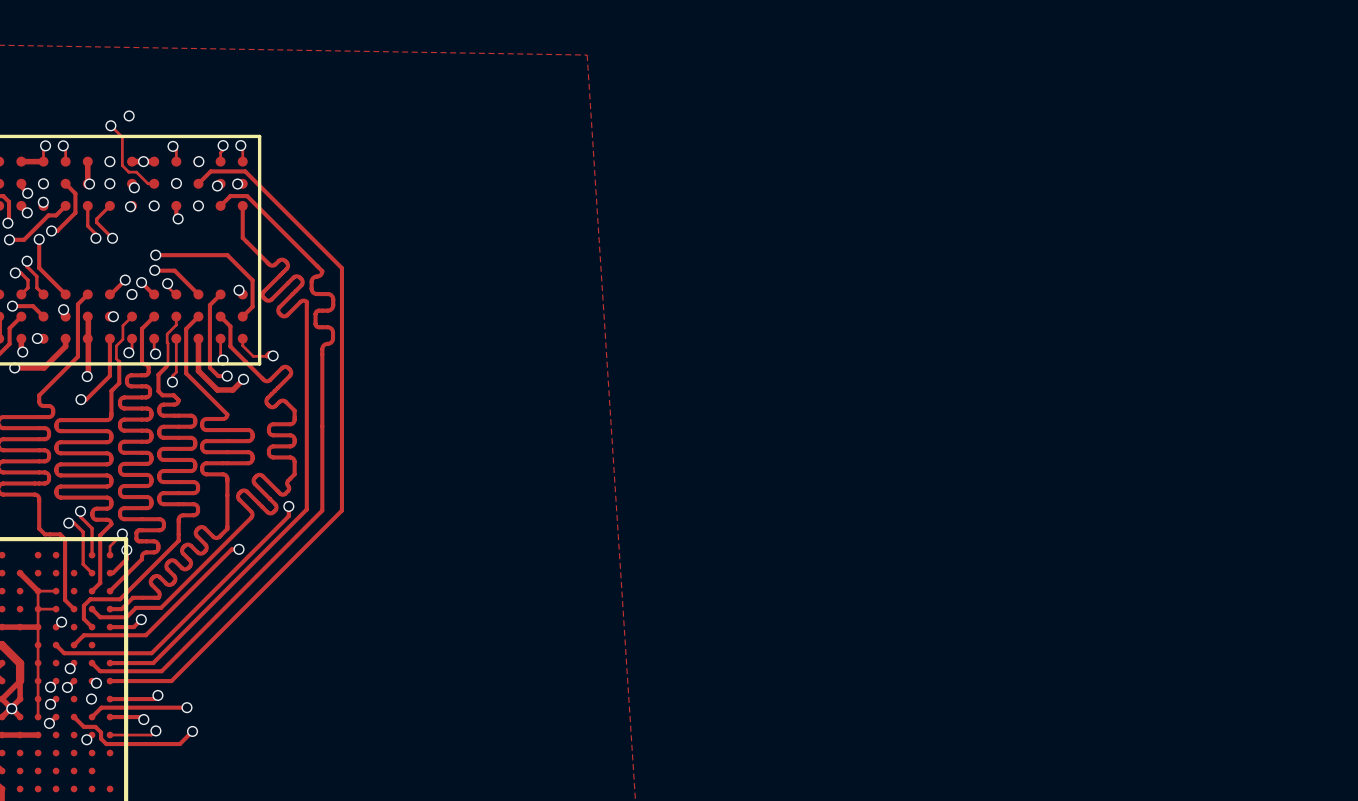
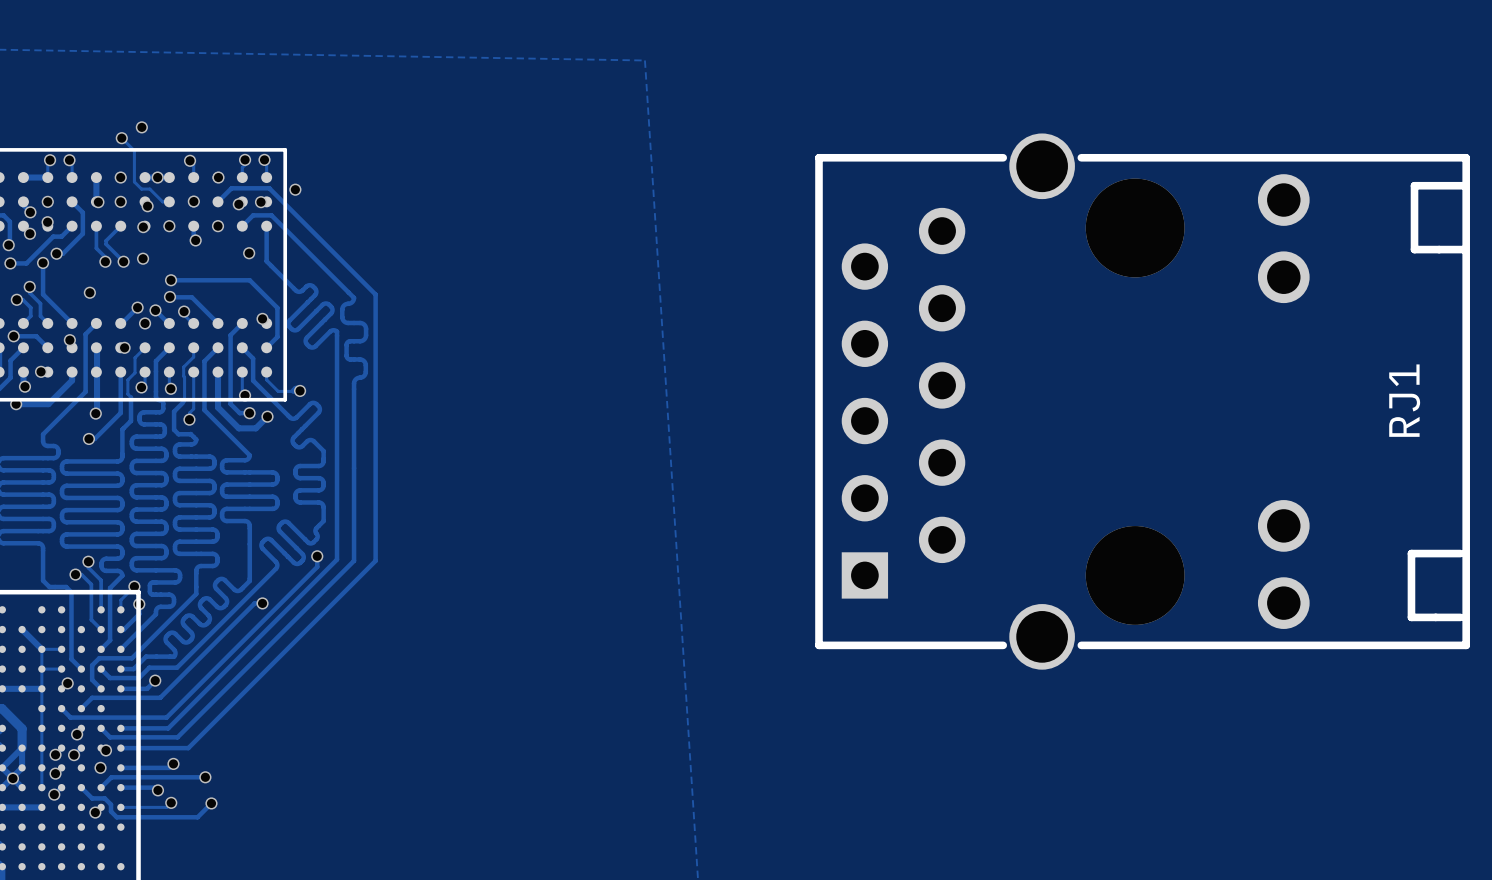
via: none -> (295, 189)
via: none -> (249, 253)
via: none -> (143, 258)
via: none -> (89, 292)
RJ1: none -> (1142, 401)

